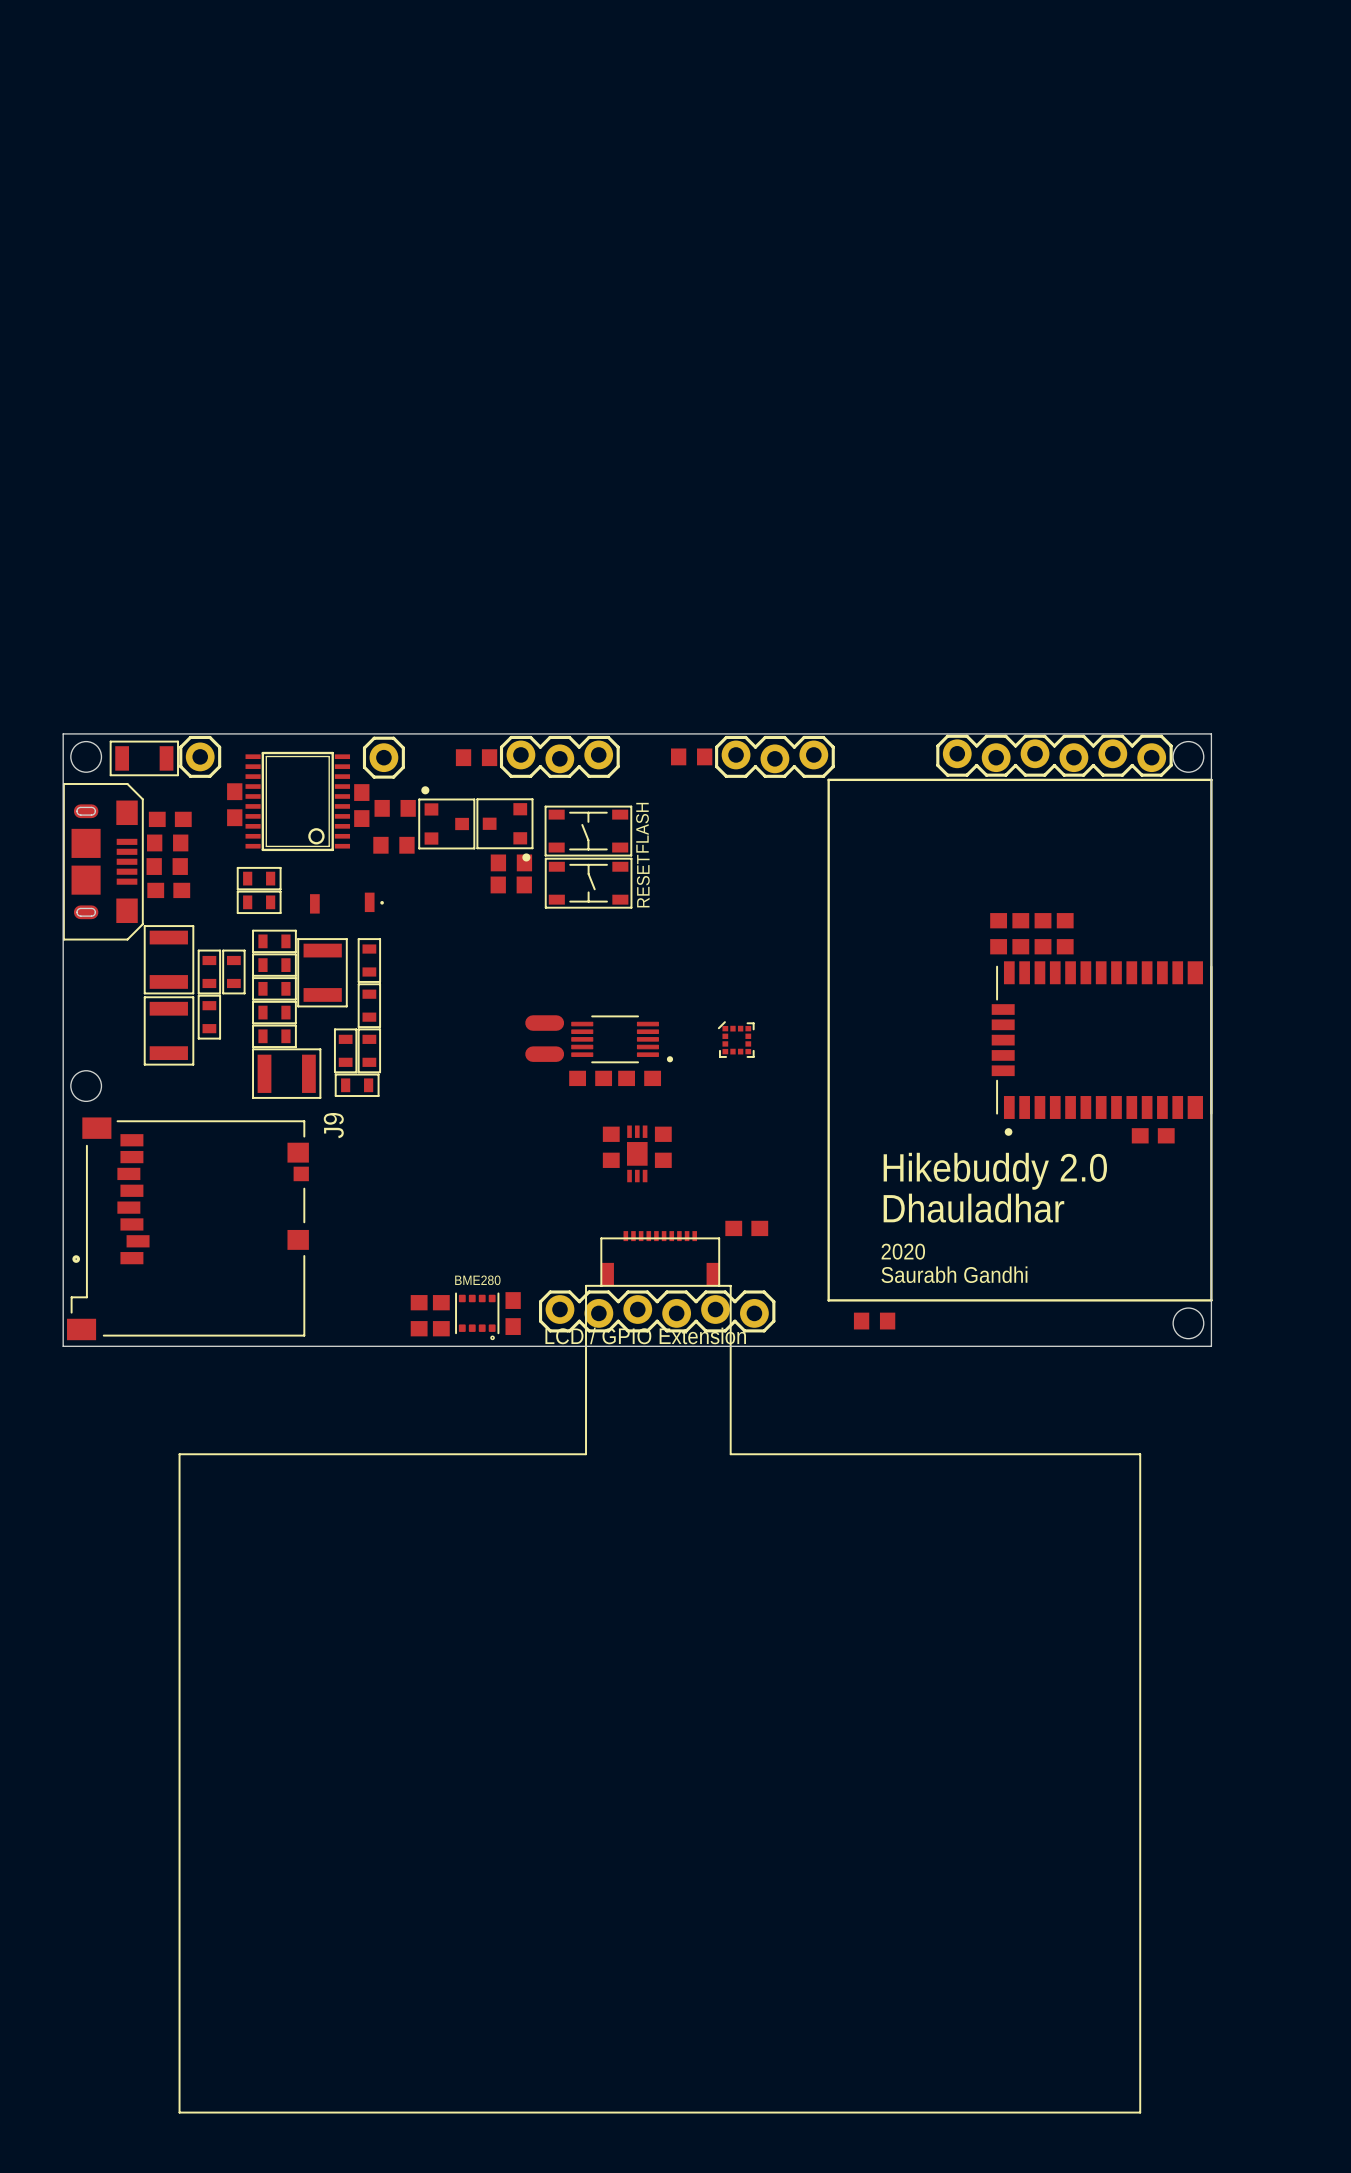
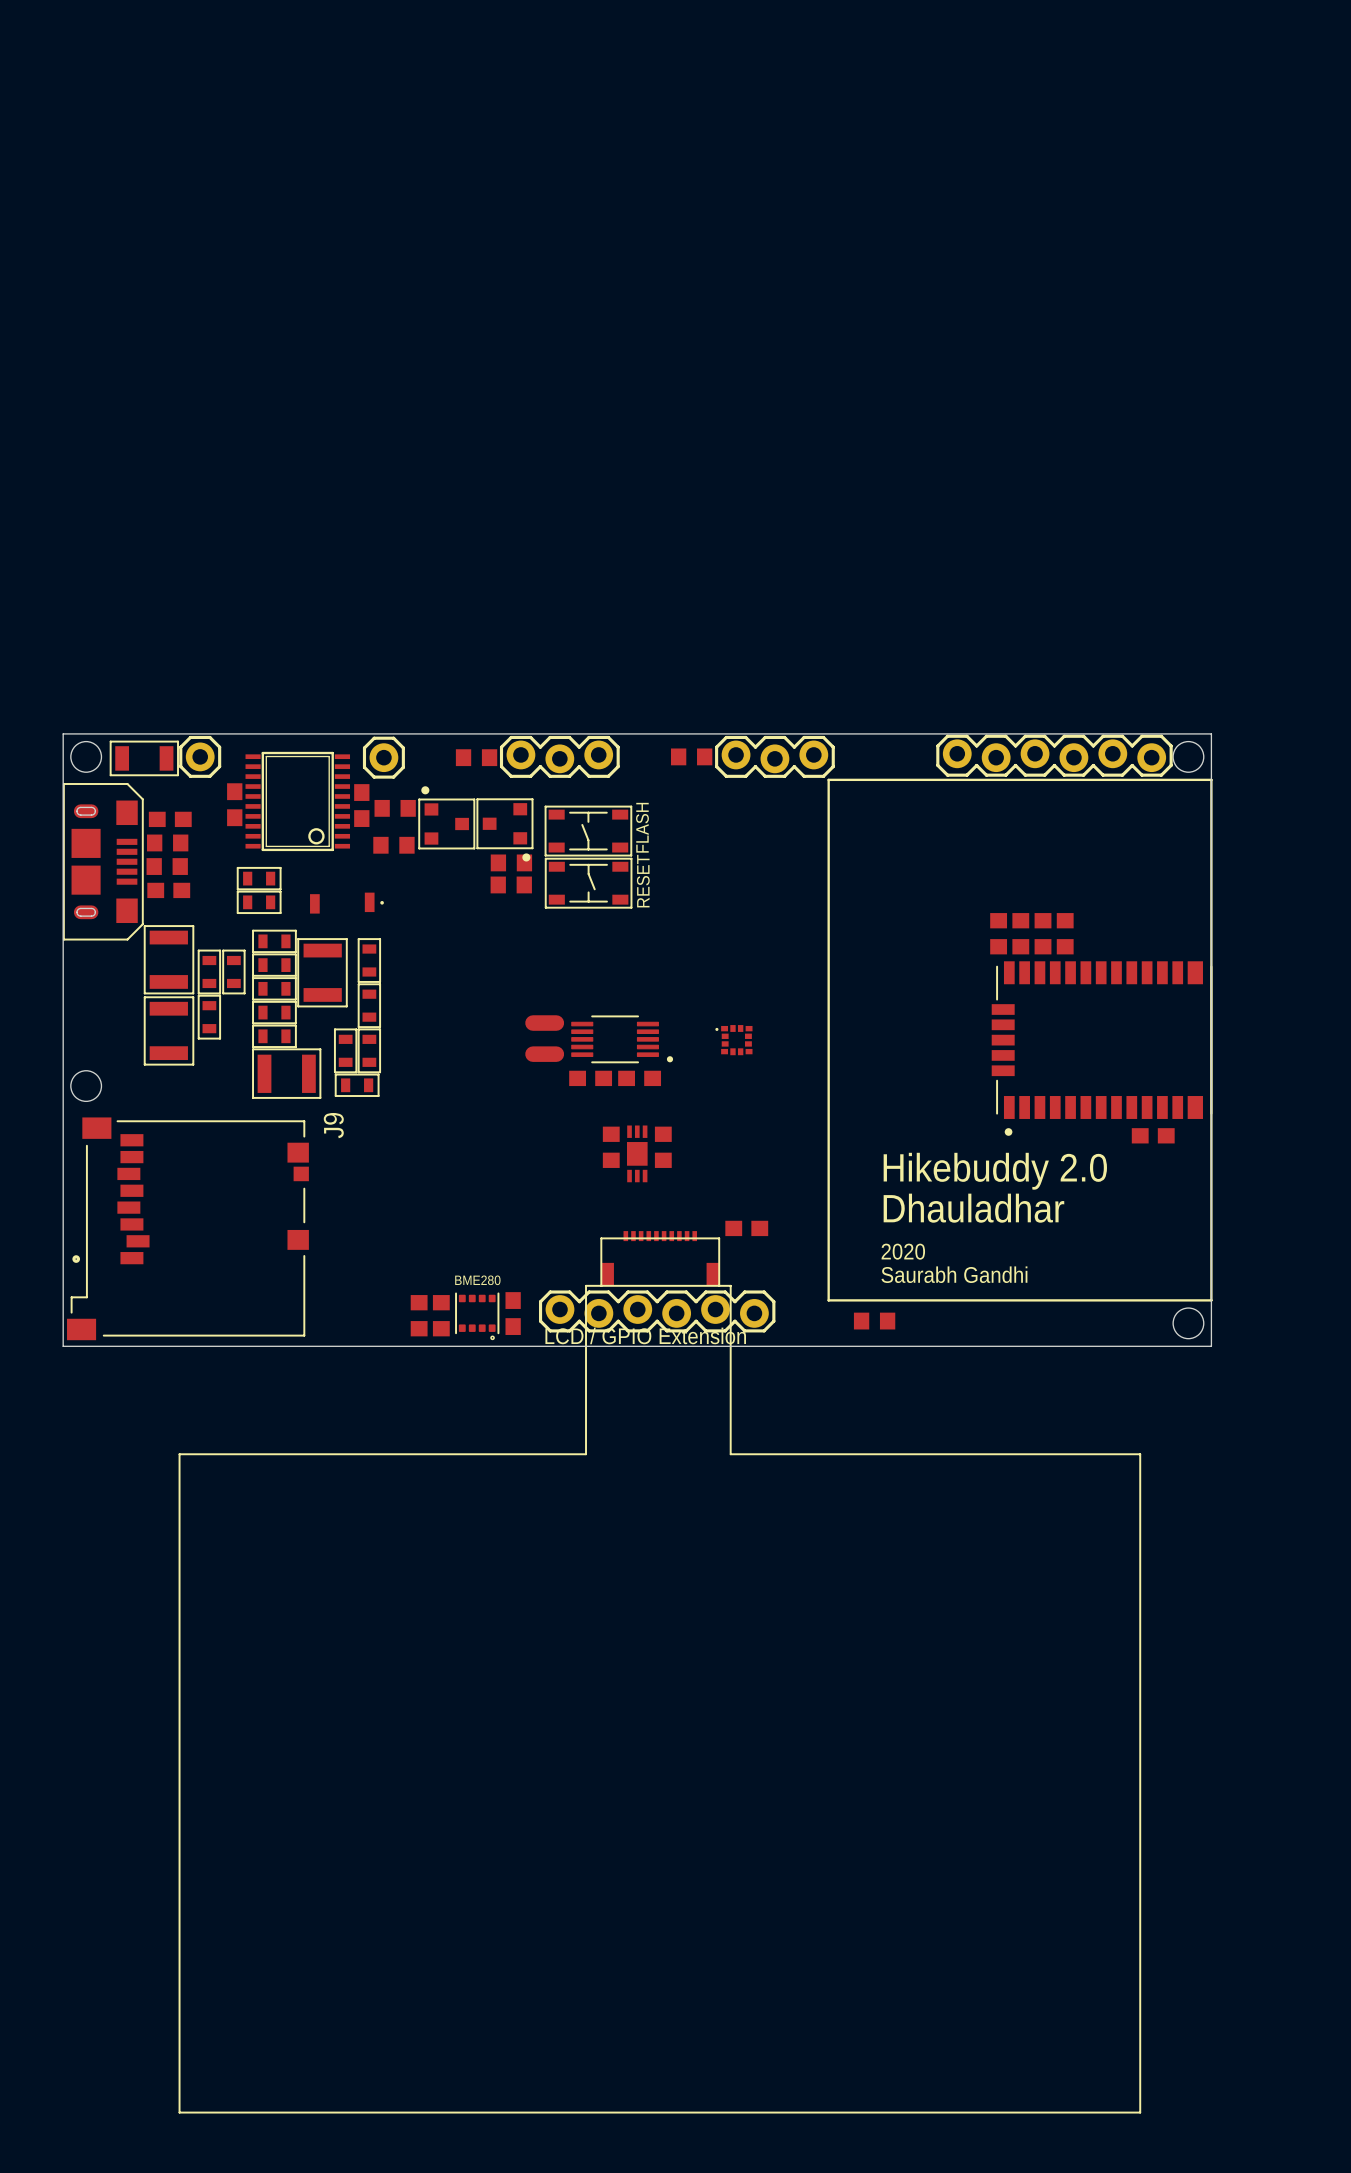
part footprint: [717, 1021, 755, 1058] -> [715, 1025, 753, 1056]

